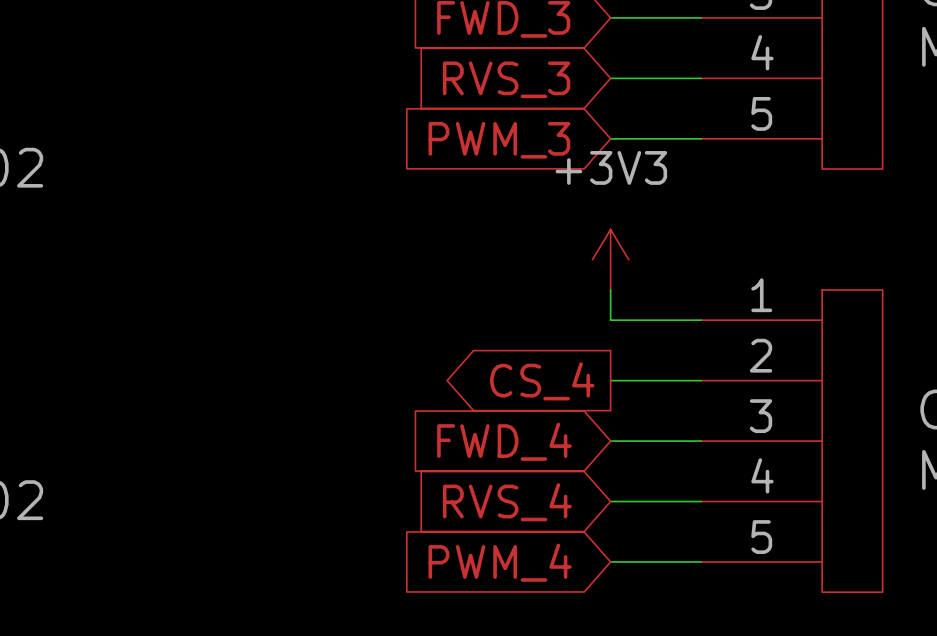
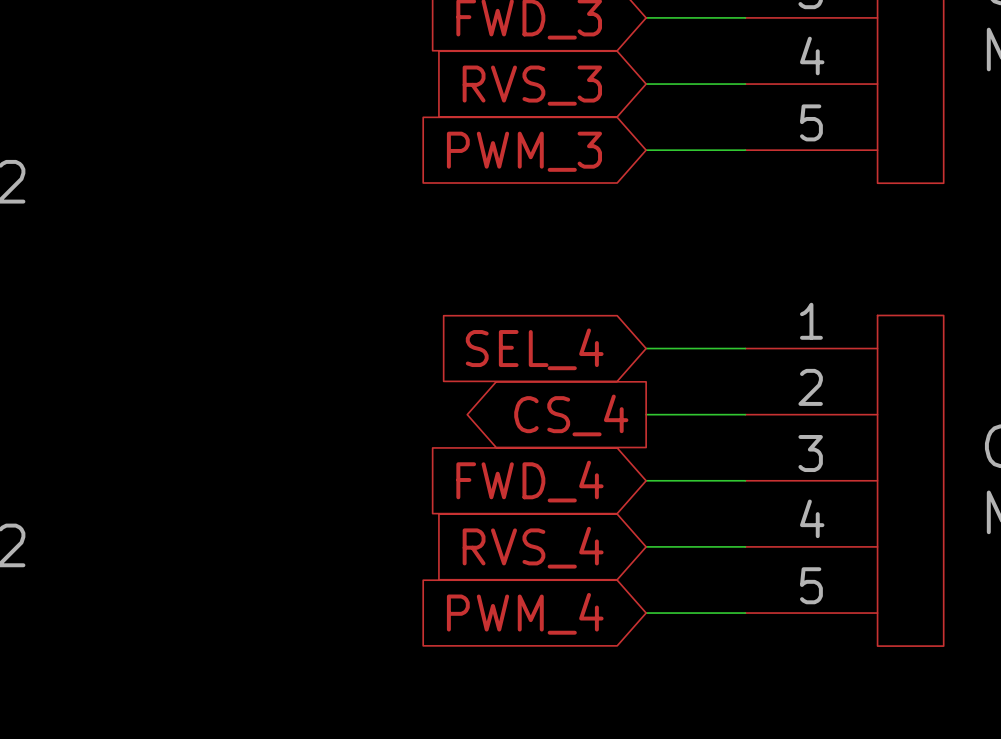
power symbol: +3V3 (610, 259) -> none
wire: (610, 289) (610, 320) -> none
global label: none -> SEL_4 (534, 349)

